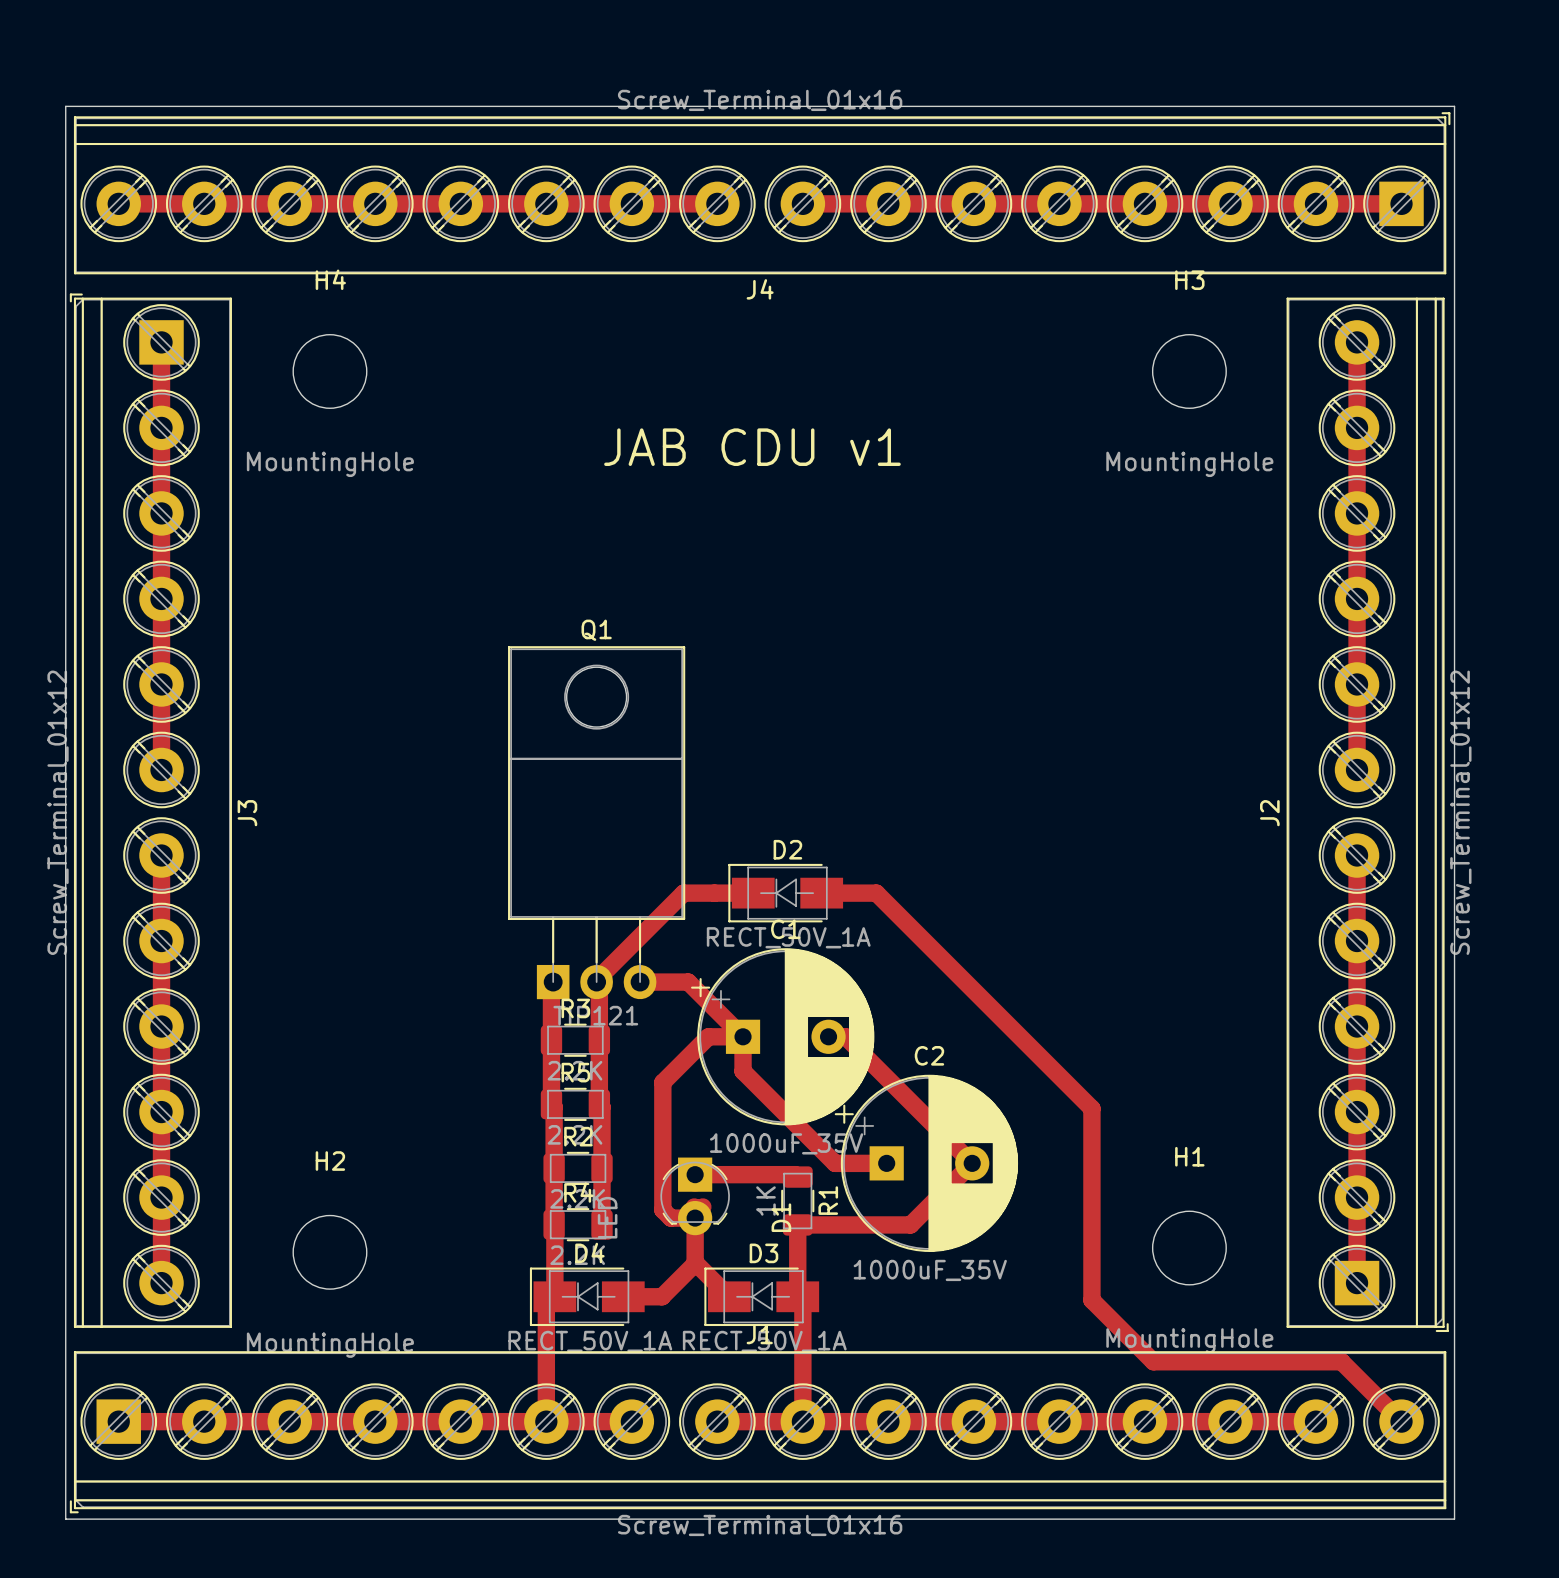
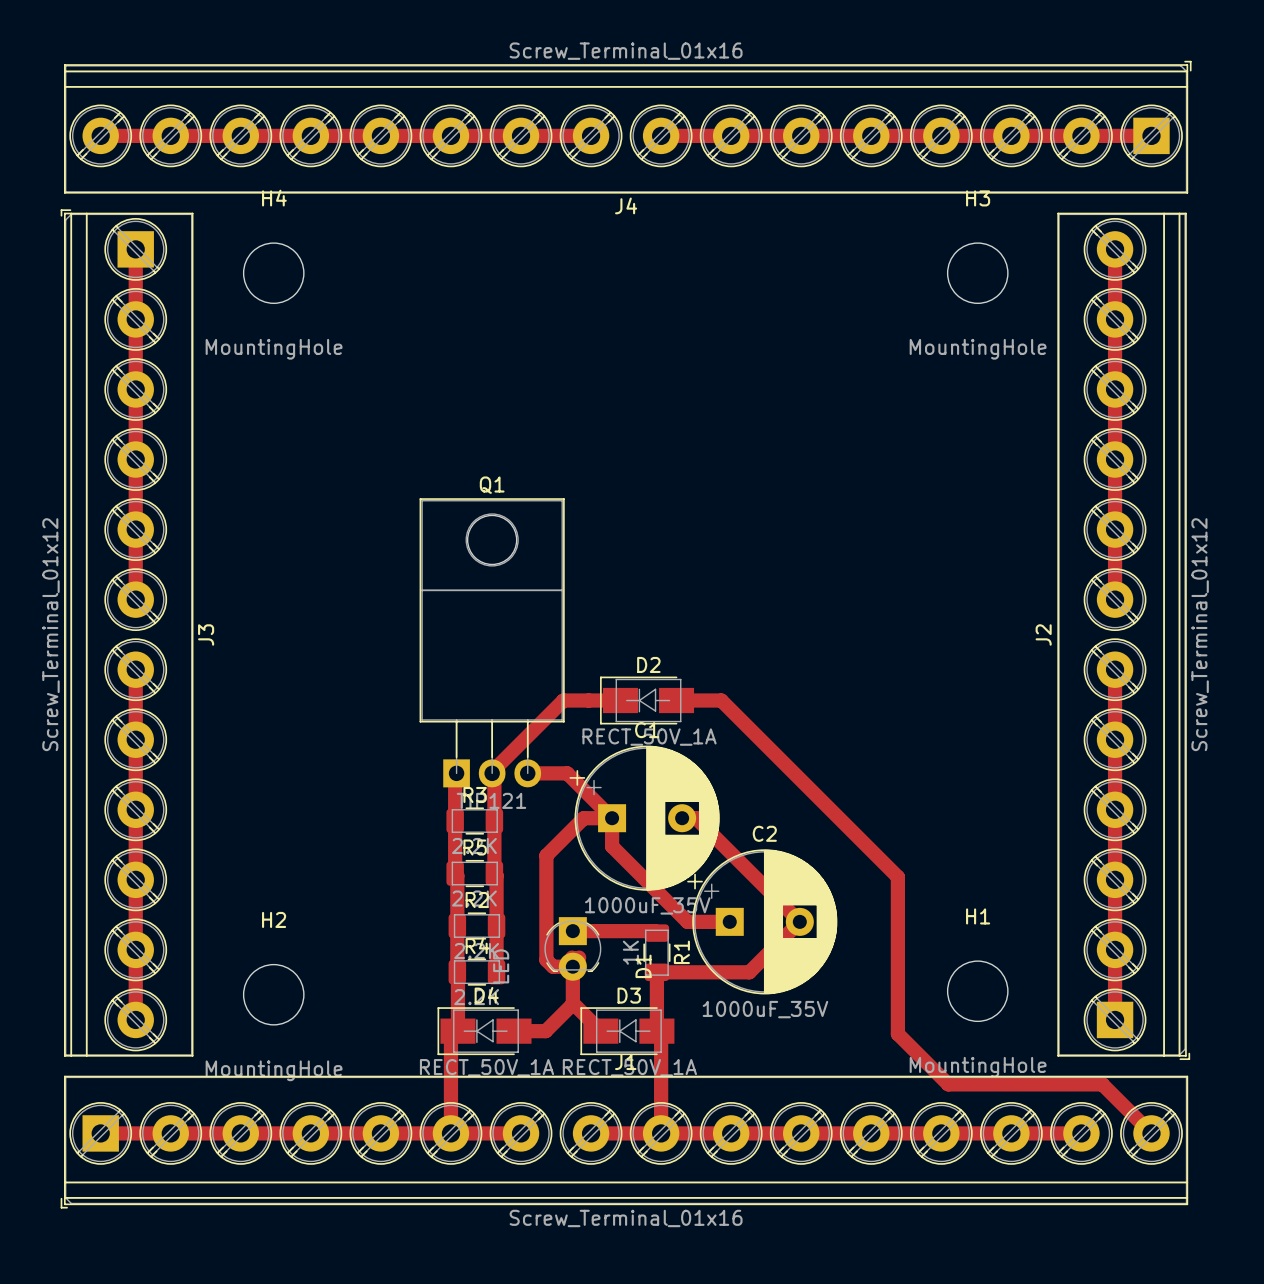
board edge: (65, 106) (1454, 106) (1454, 1519) (65, 1519) (65, 106) -> none
text: JAB CDU v1 (752, 447) -> none

